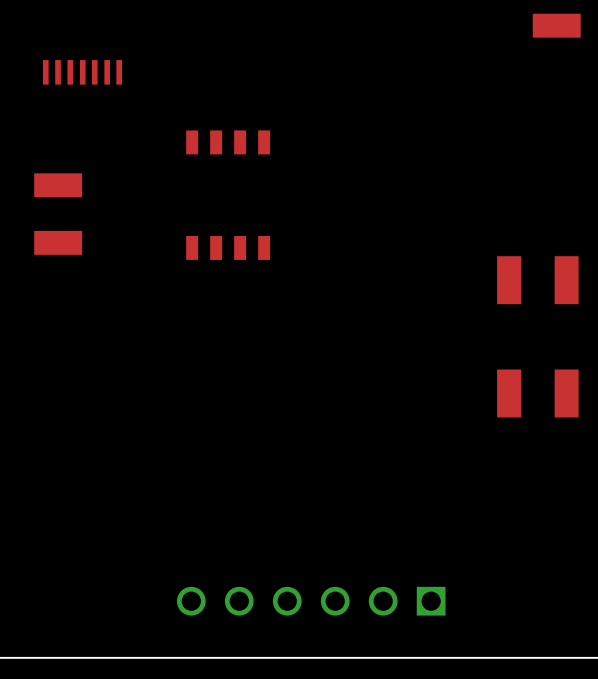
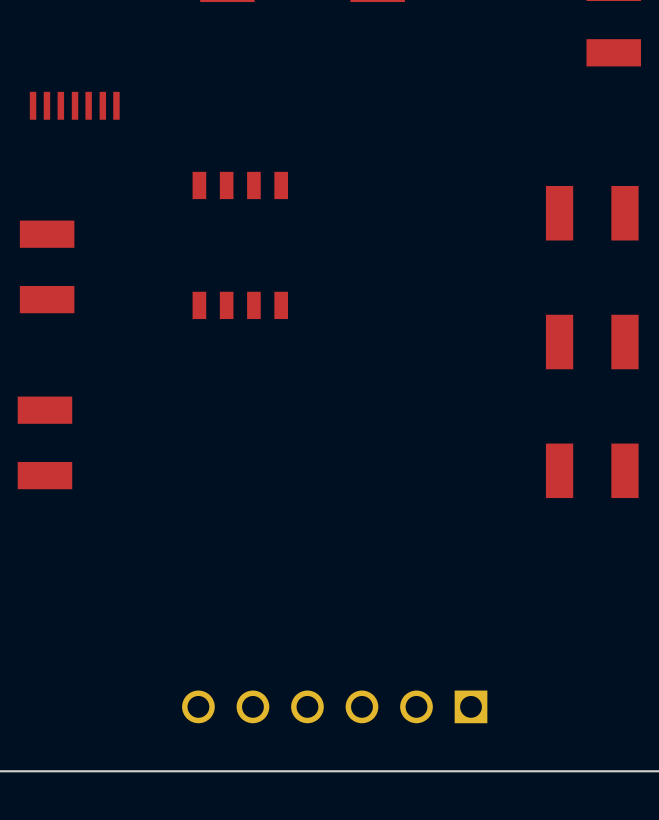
part: none -> (592, 213)
part: none -> (44, 442)

